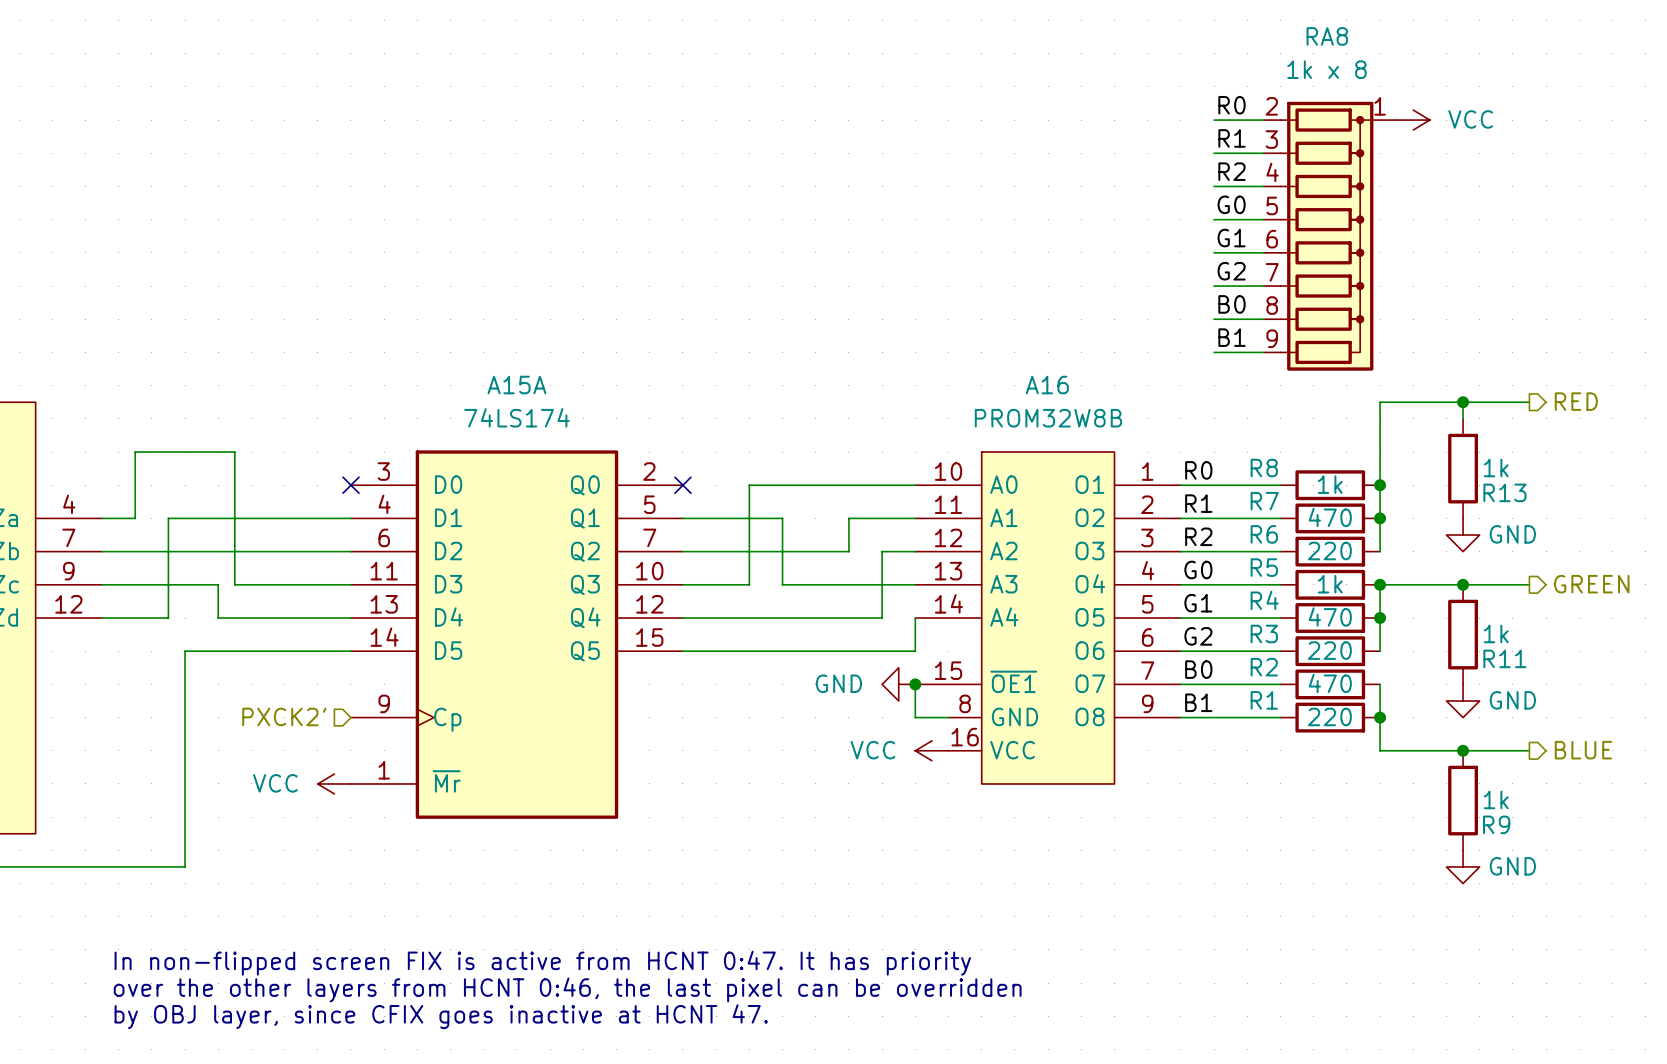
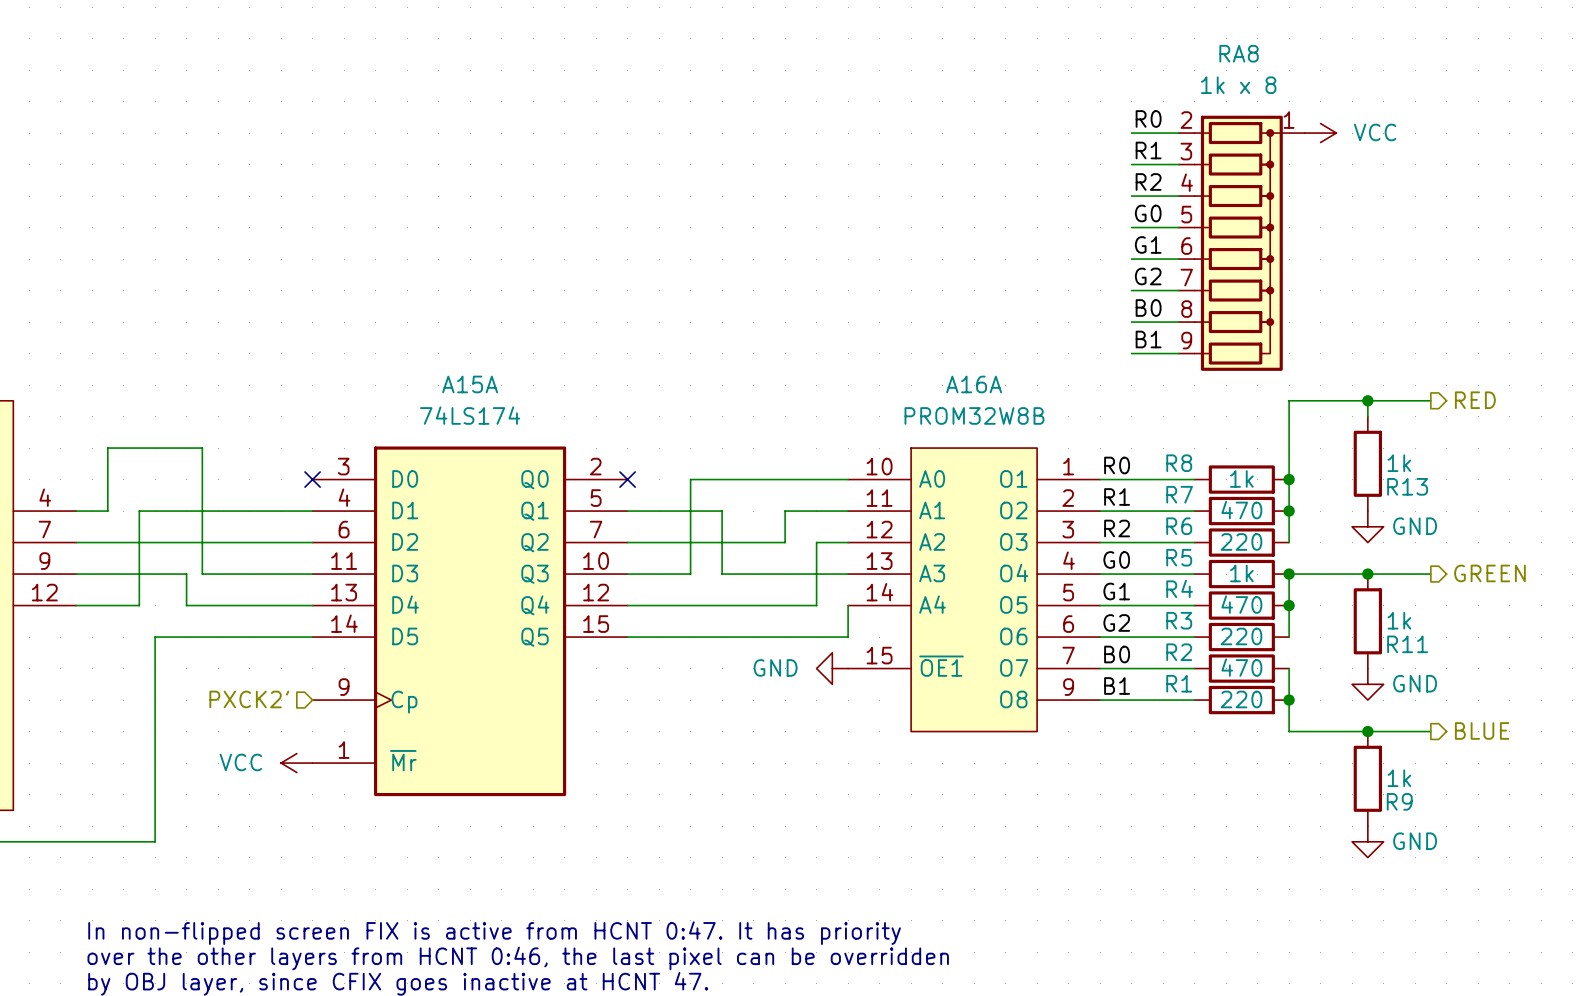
A16A: none -> PROM32W8B (974, 589)
A16: PROM32W8B (1048, 618) -> none
wire: (915, 684) (915, 717) (948, 717) -> none
junction: (915, 684) -> none
power symbol: VCC (931, 750) -> none

